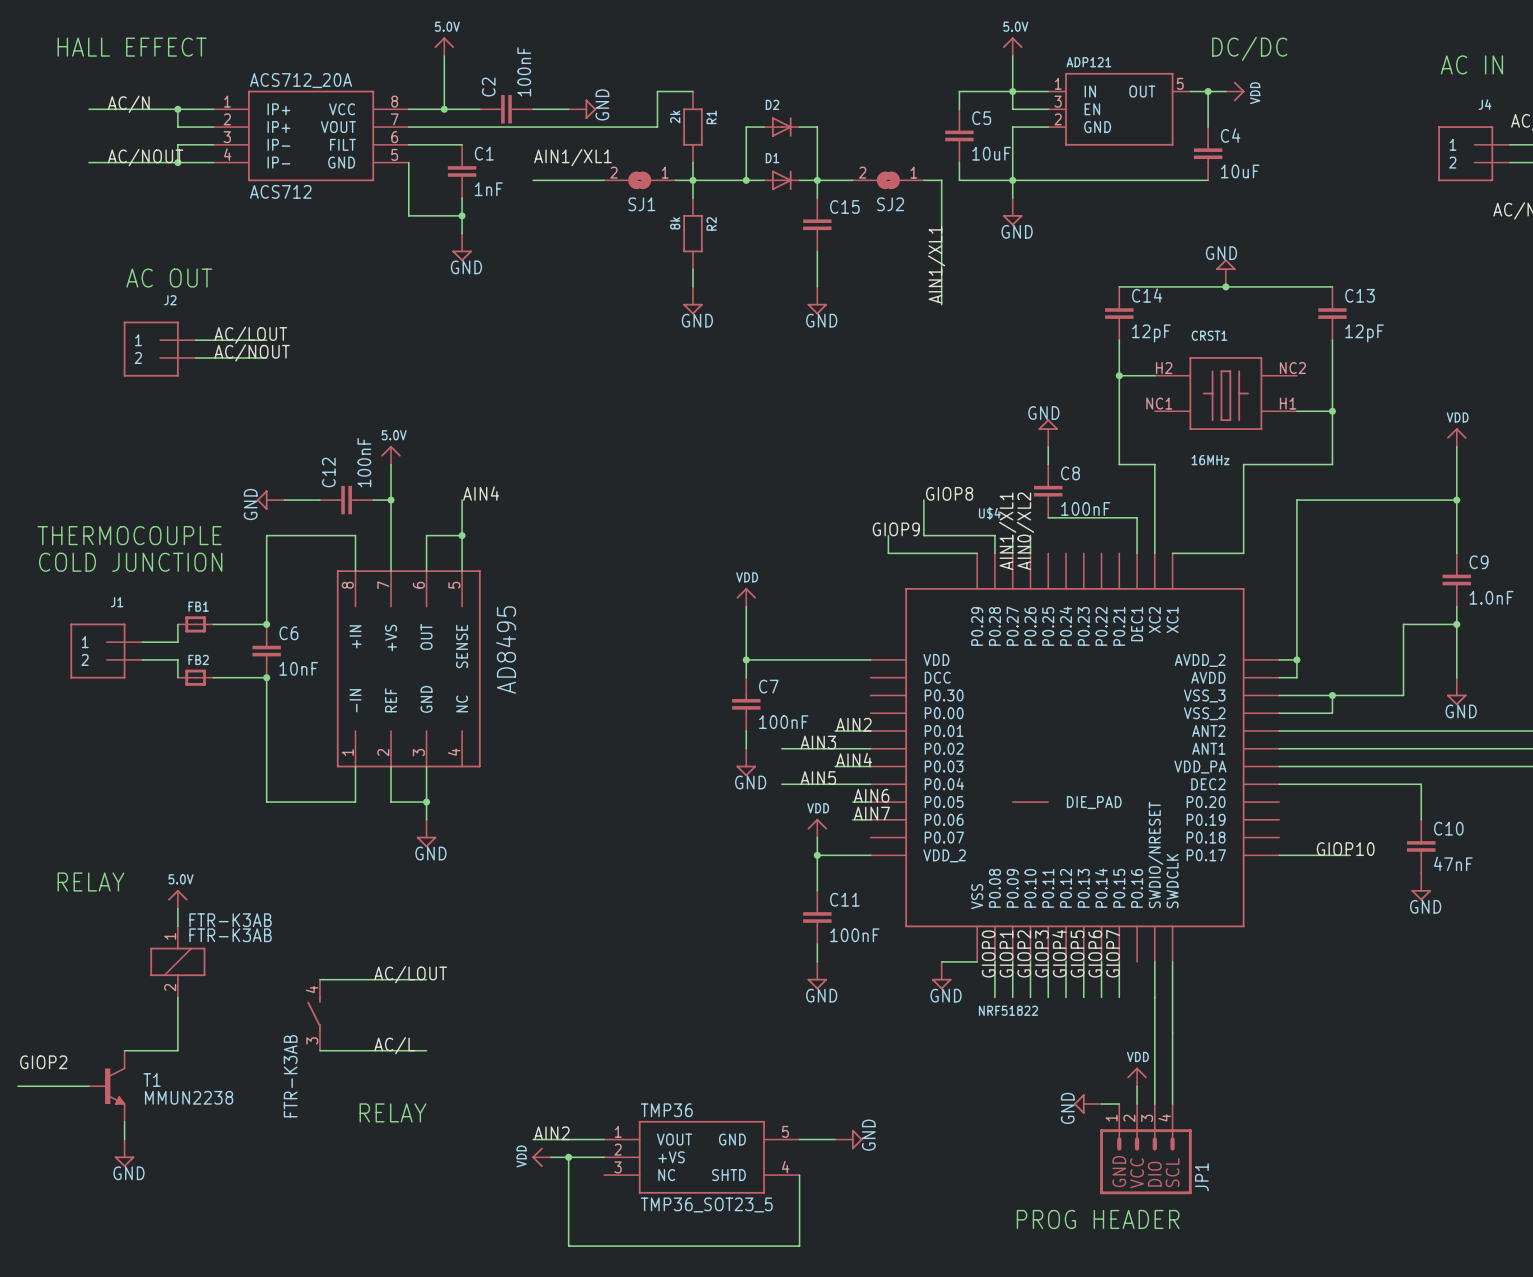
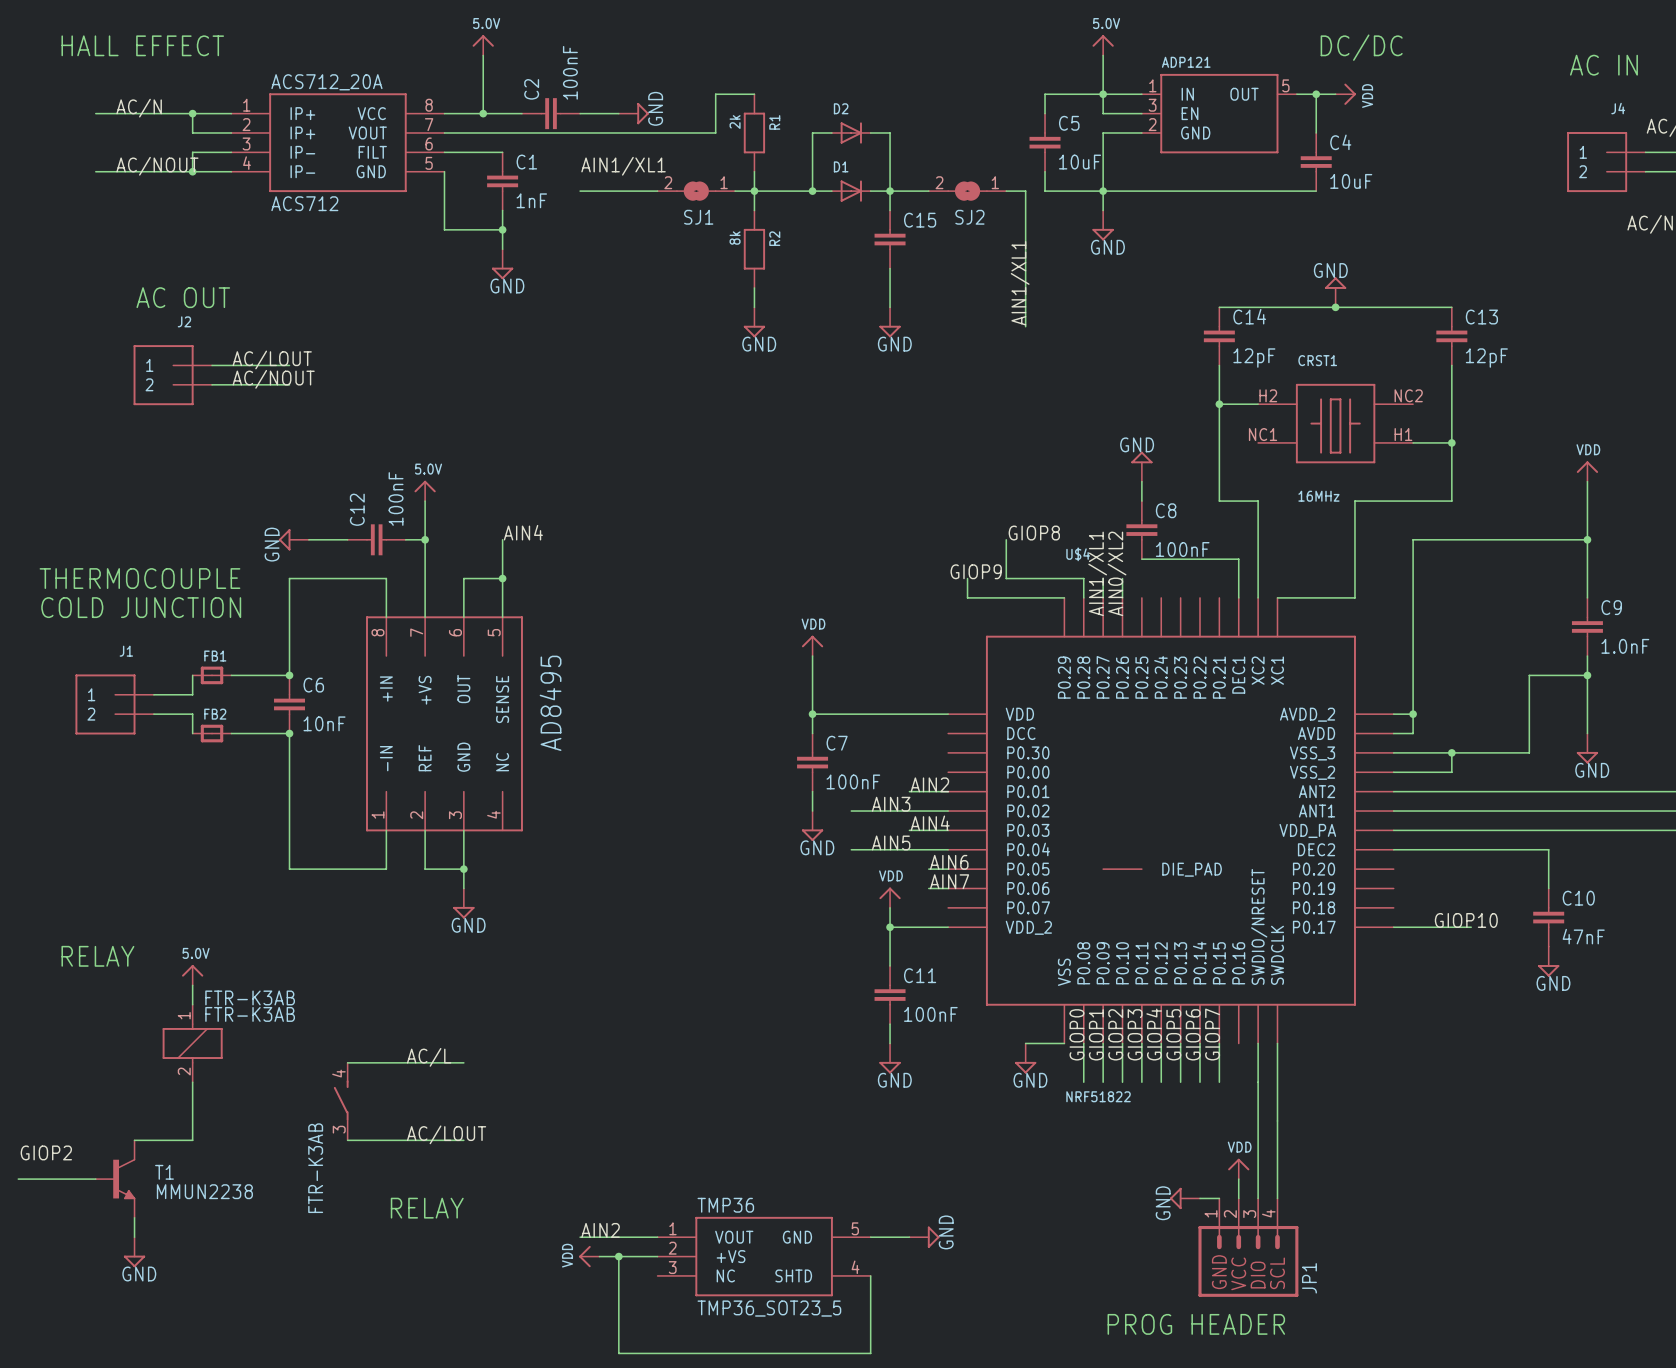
label: AC/LOUT (410, 974) -> AC/L (429, 1057)
label: AC/L (394, 1045) -> AC/LOUT (446, 1134)

